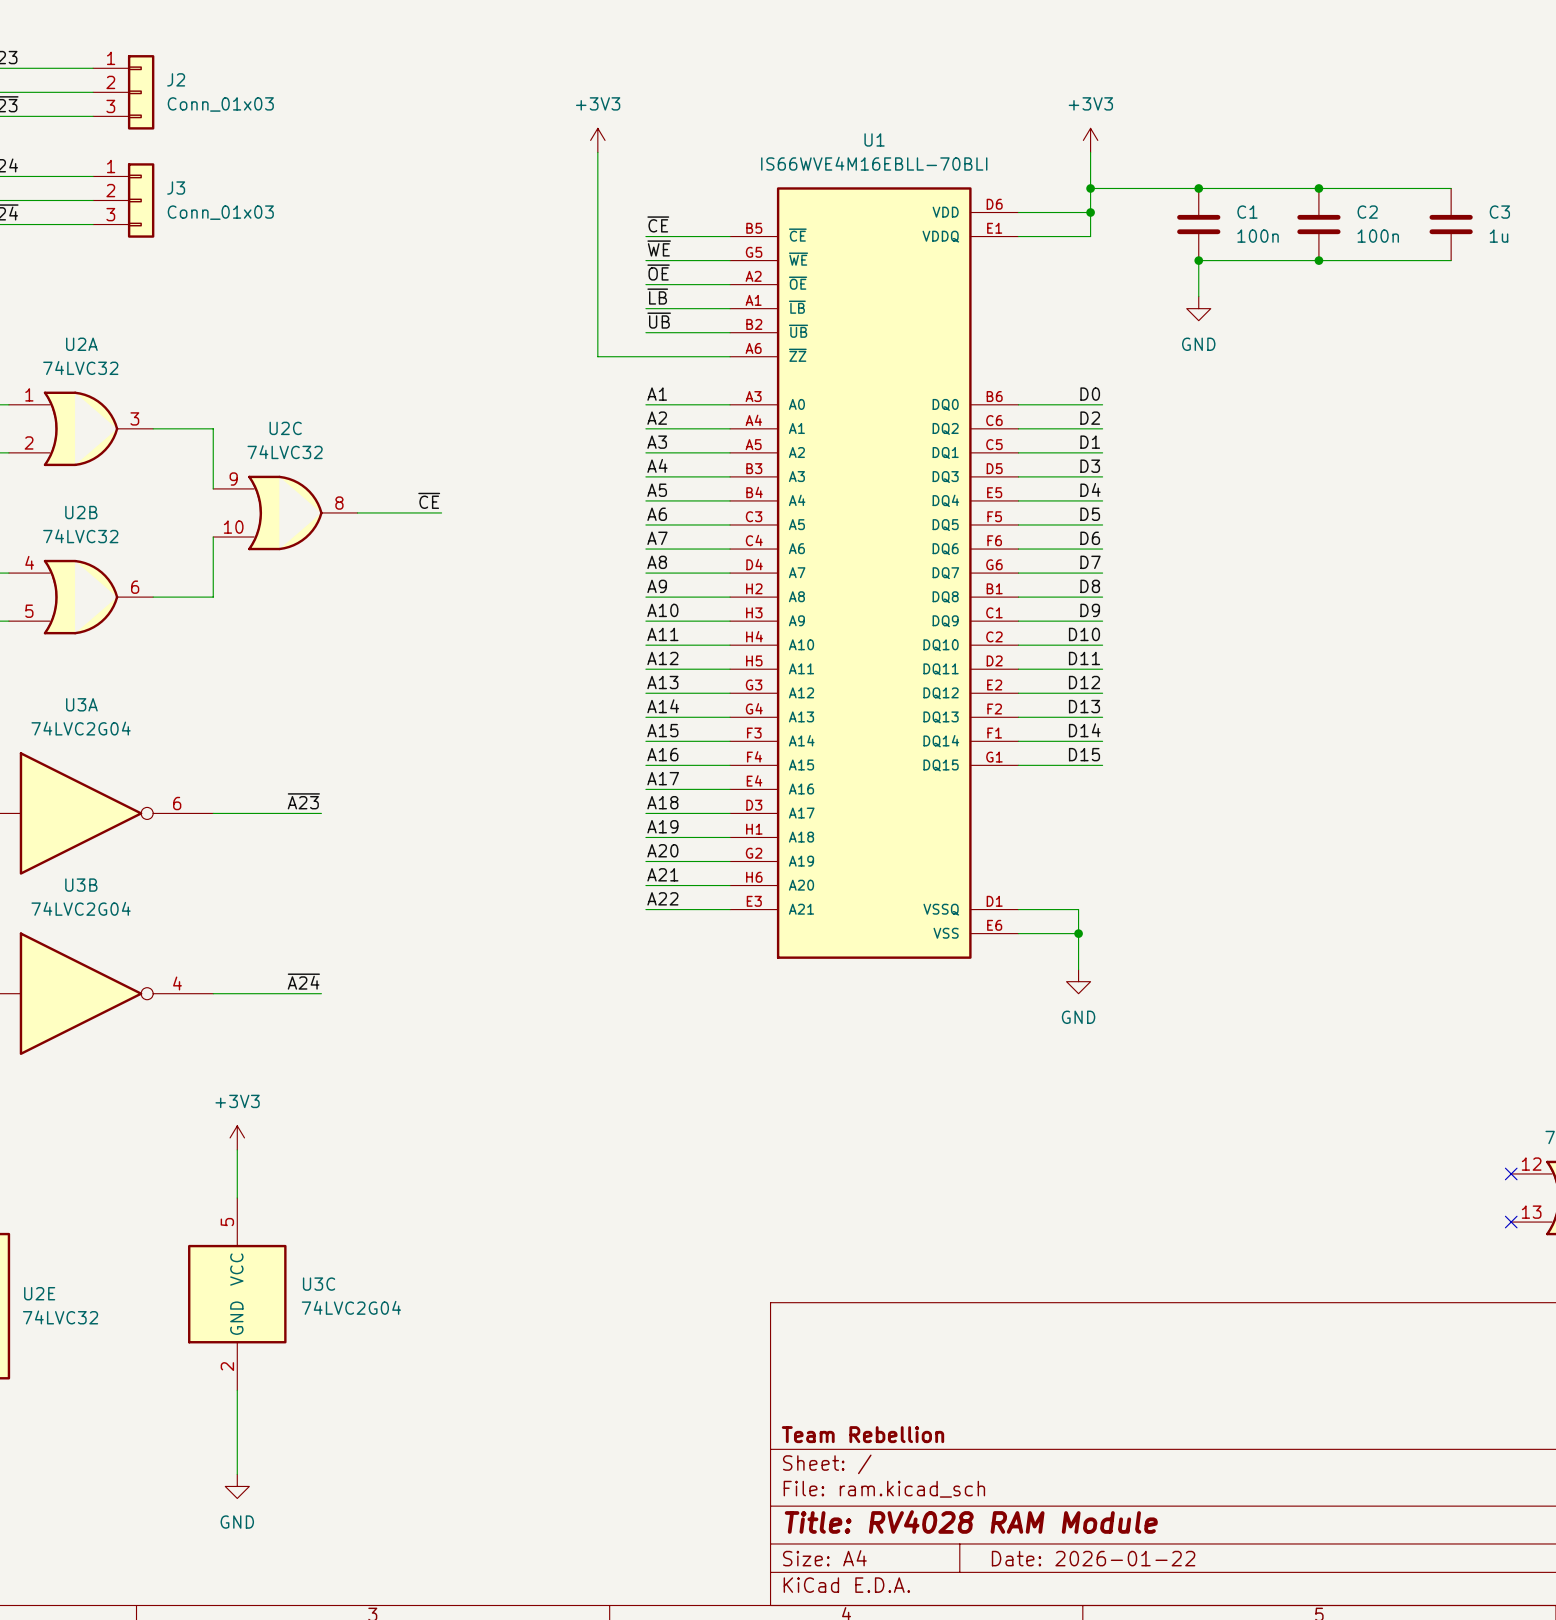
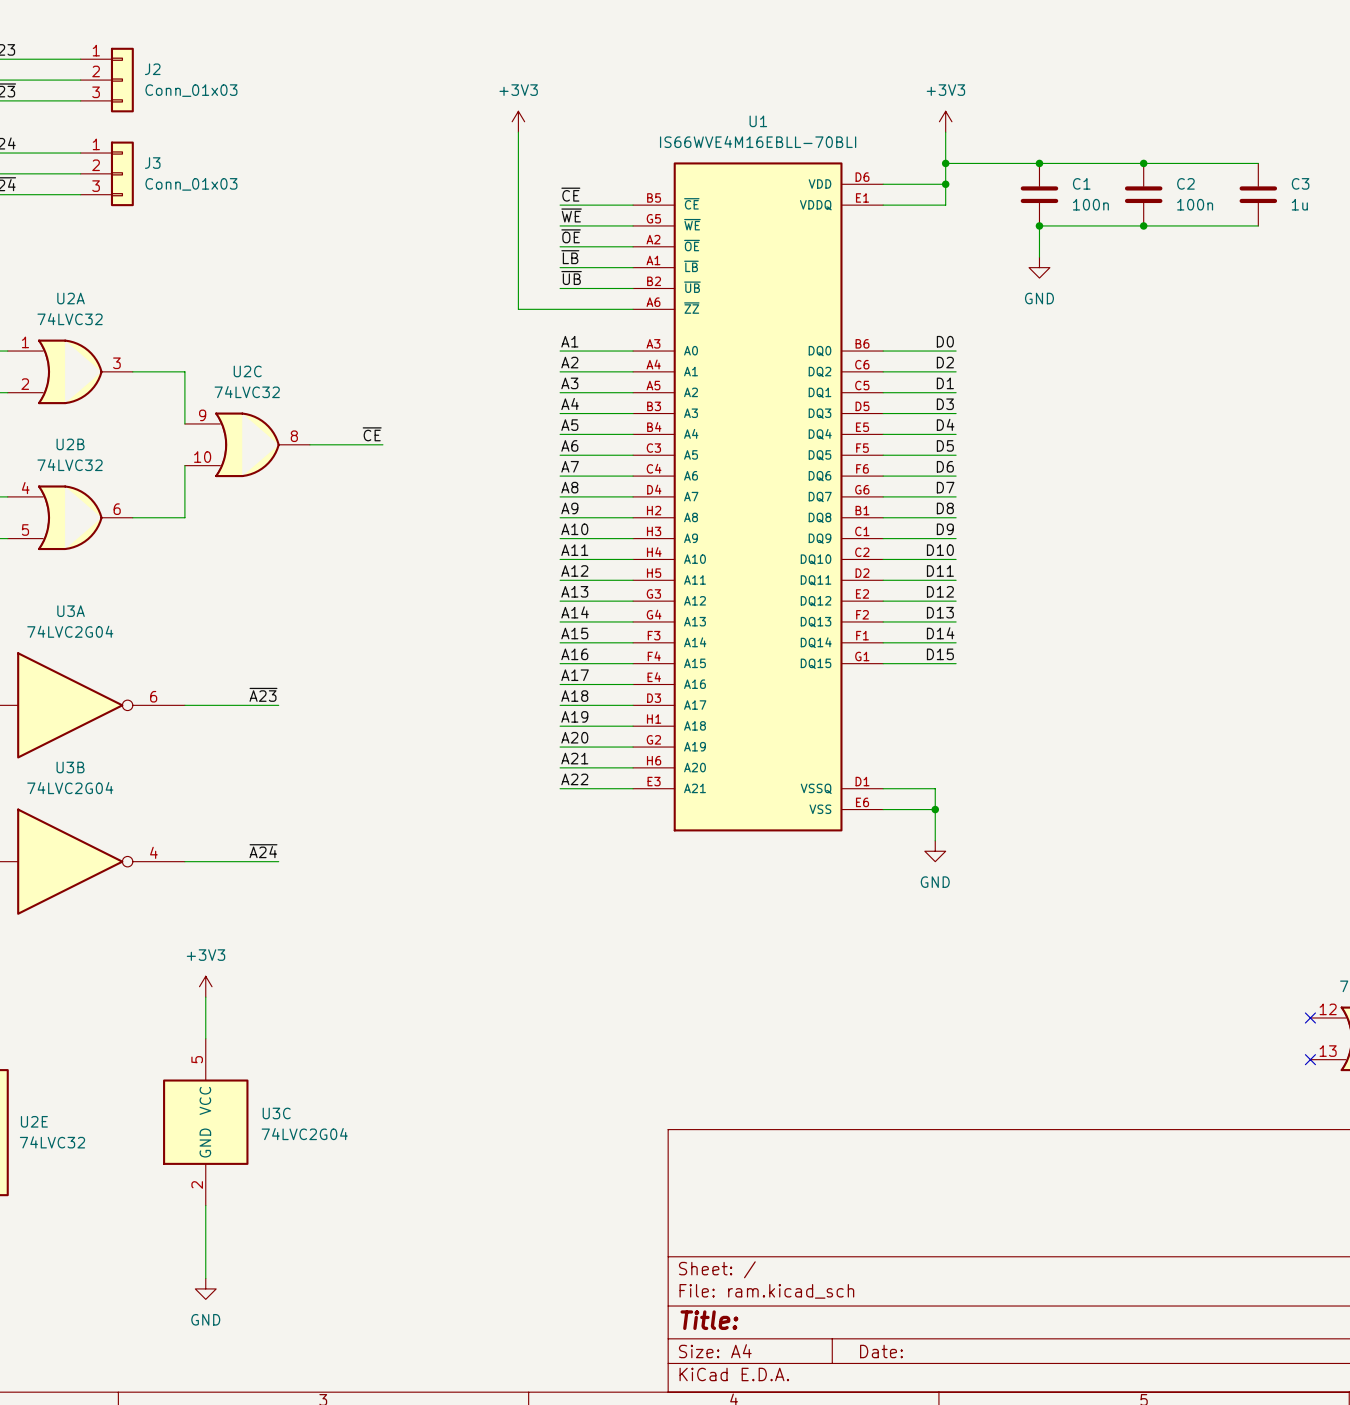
title block: Team Rebellion (862, 1434) -> none
title block: Title: RV4028 RAM Module (971, 1522) -> Title: (709, 1320)
title block: Date: 2026-01-22 (1093, 1558) -> Date: (881, 1351)

